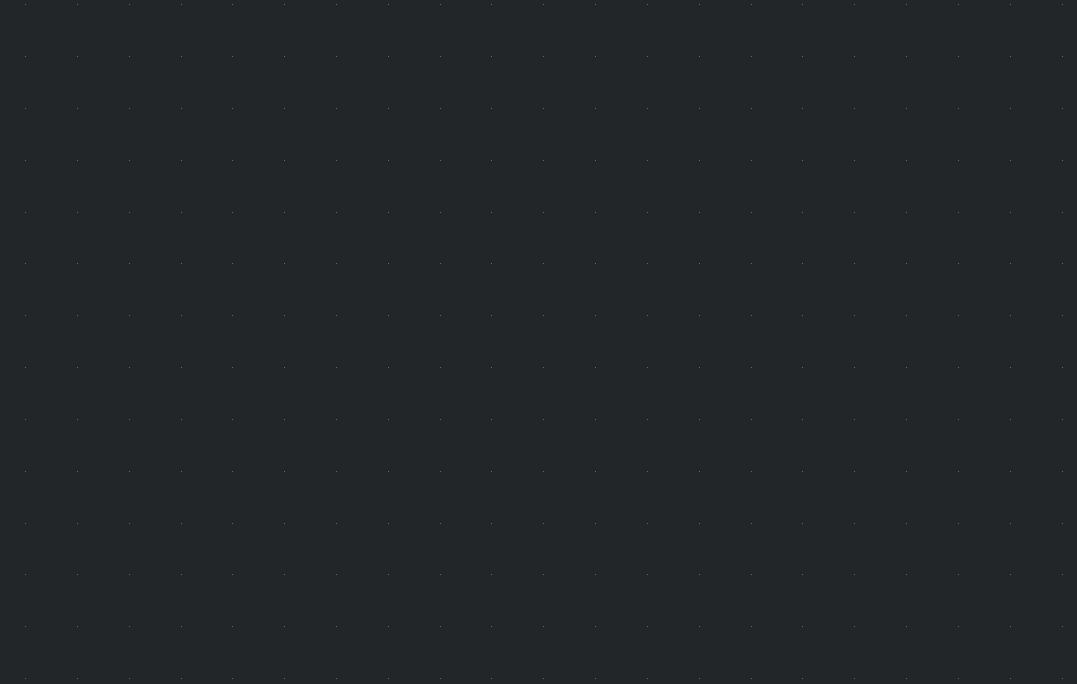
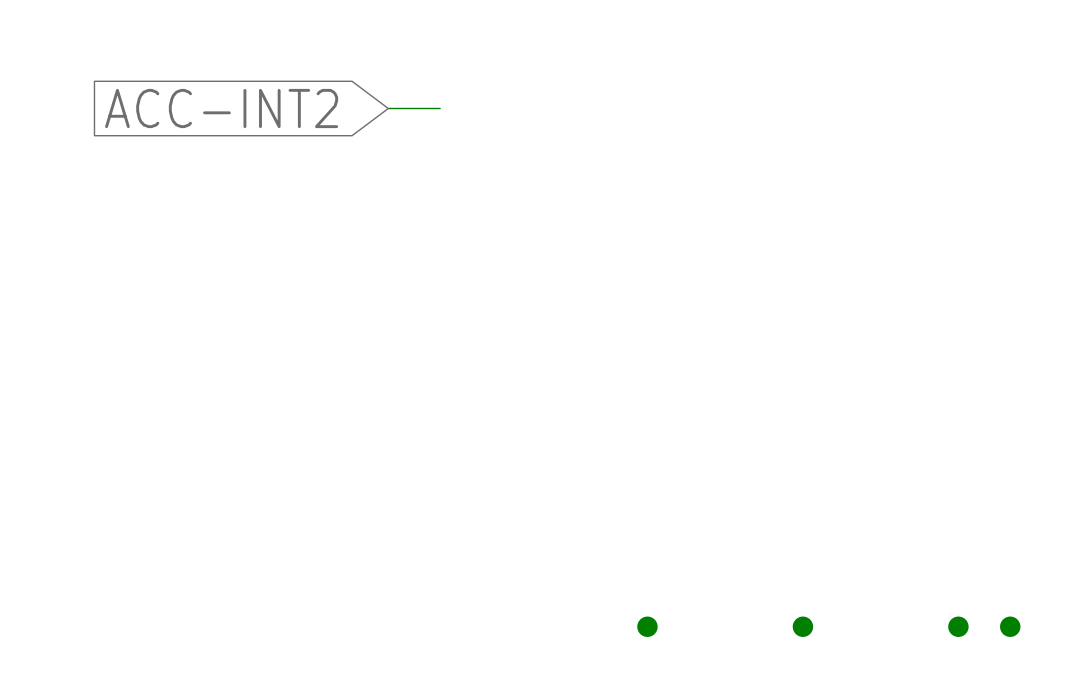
global label: none -> ACC-INT2 (221, 108)
wire: none -> (388, 108) (440, 108)
junction: none -> (647, 626)
junction: none -> (802, 626)
junction: none -> (958, 626)
junction: none -> (1010, 626)

